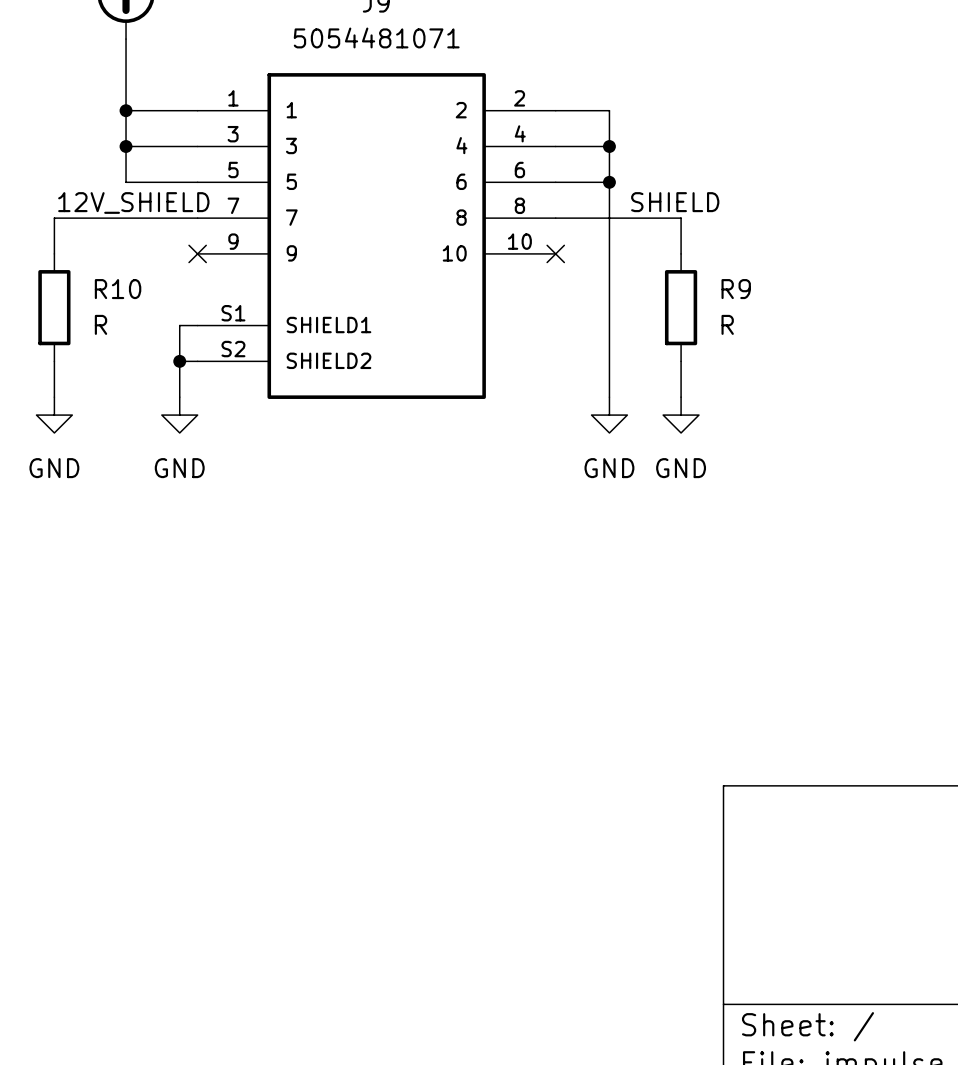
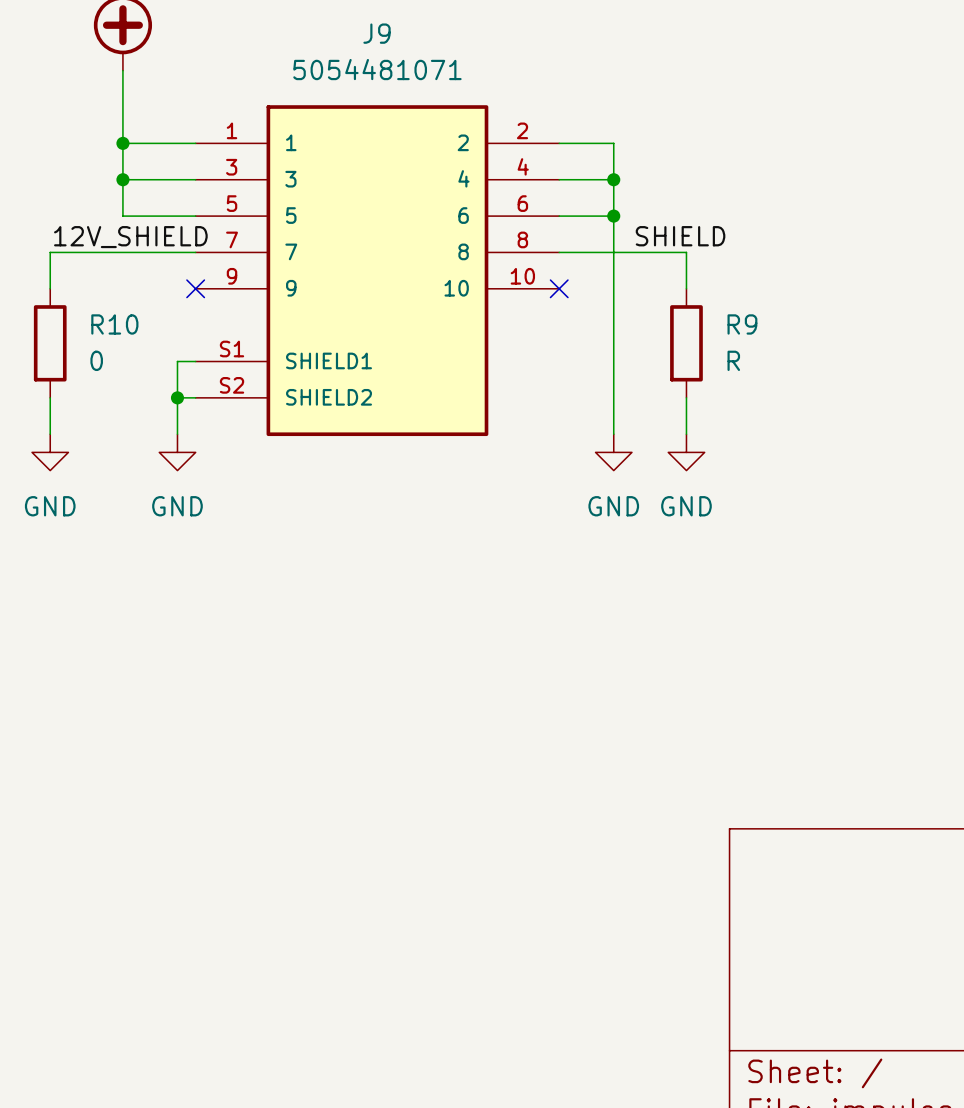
R10 value: R (101, 324) -> 0 (96, 360)

